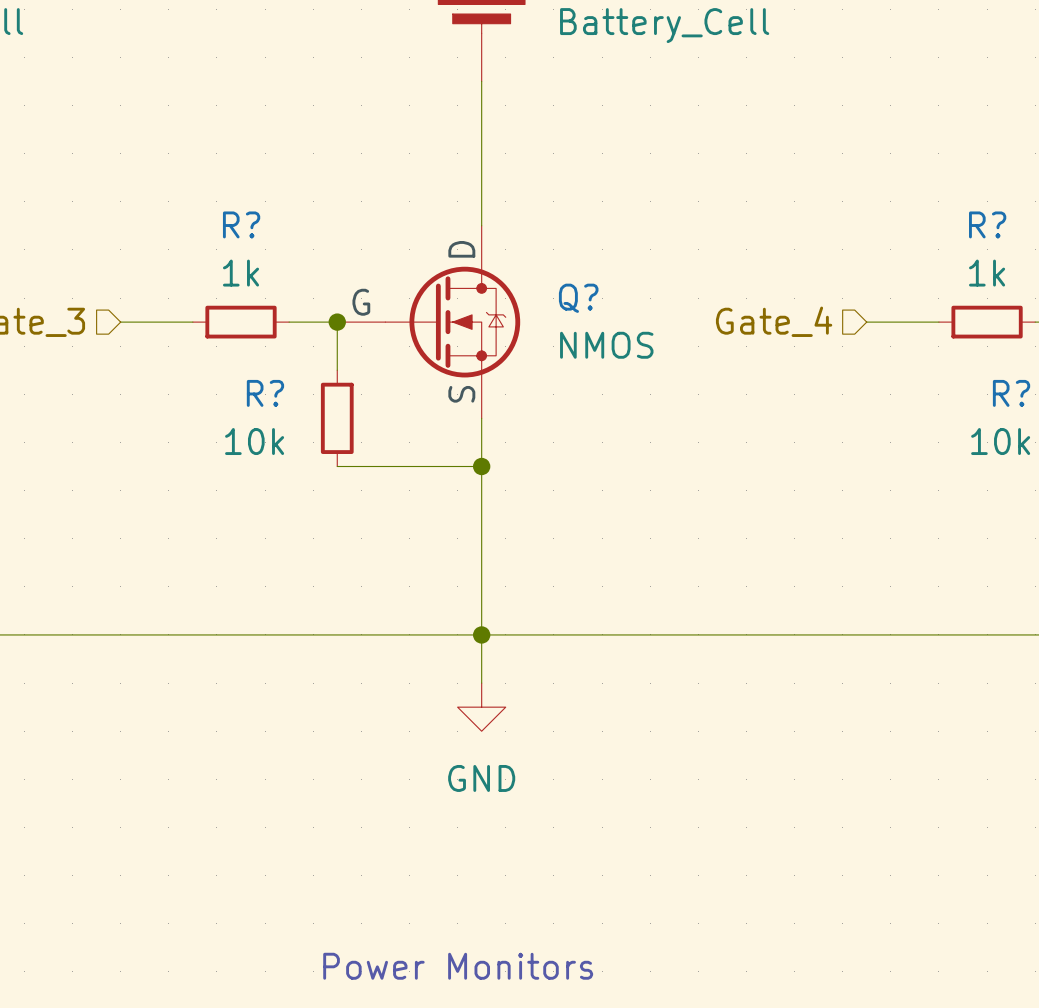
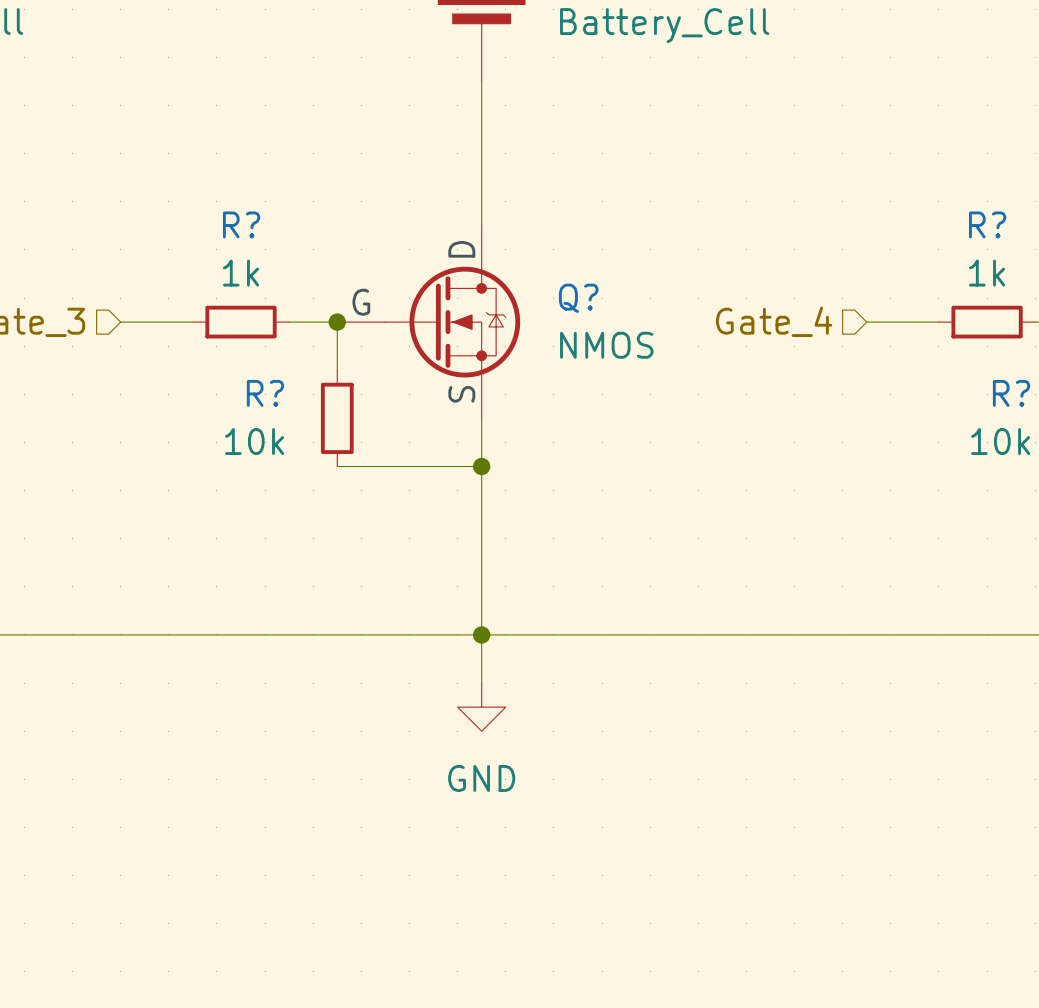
text: Power Monitors (458, 966) -> none

